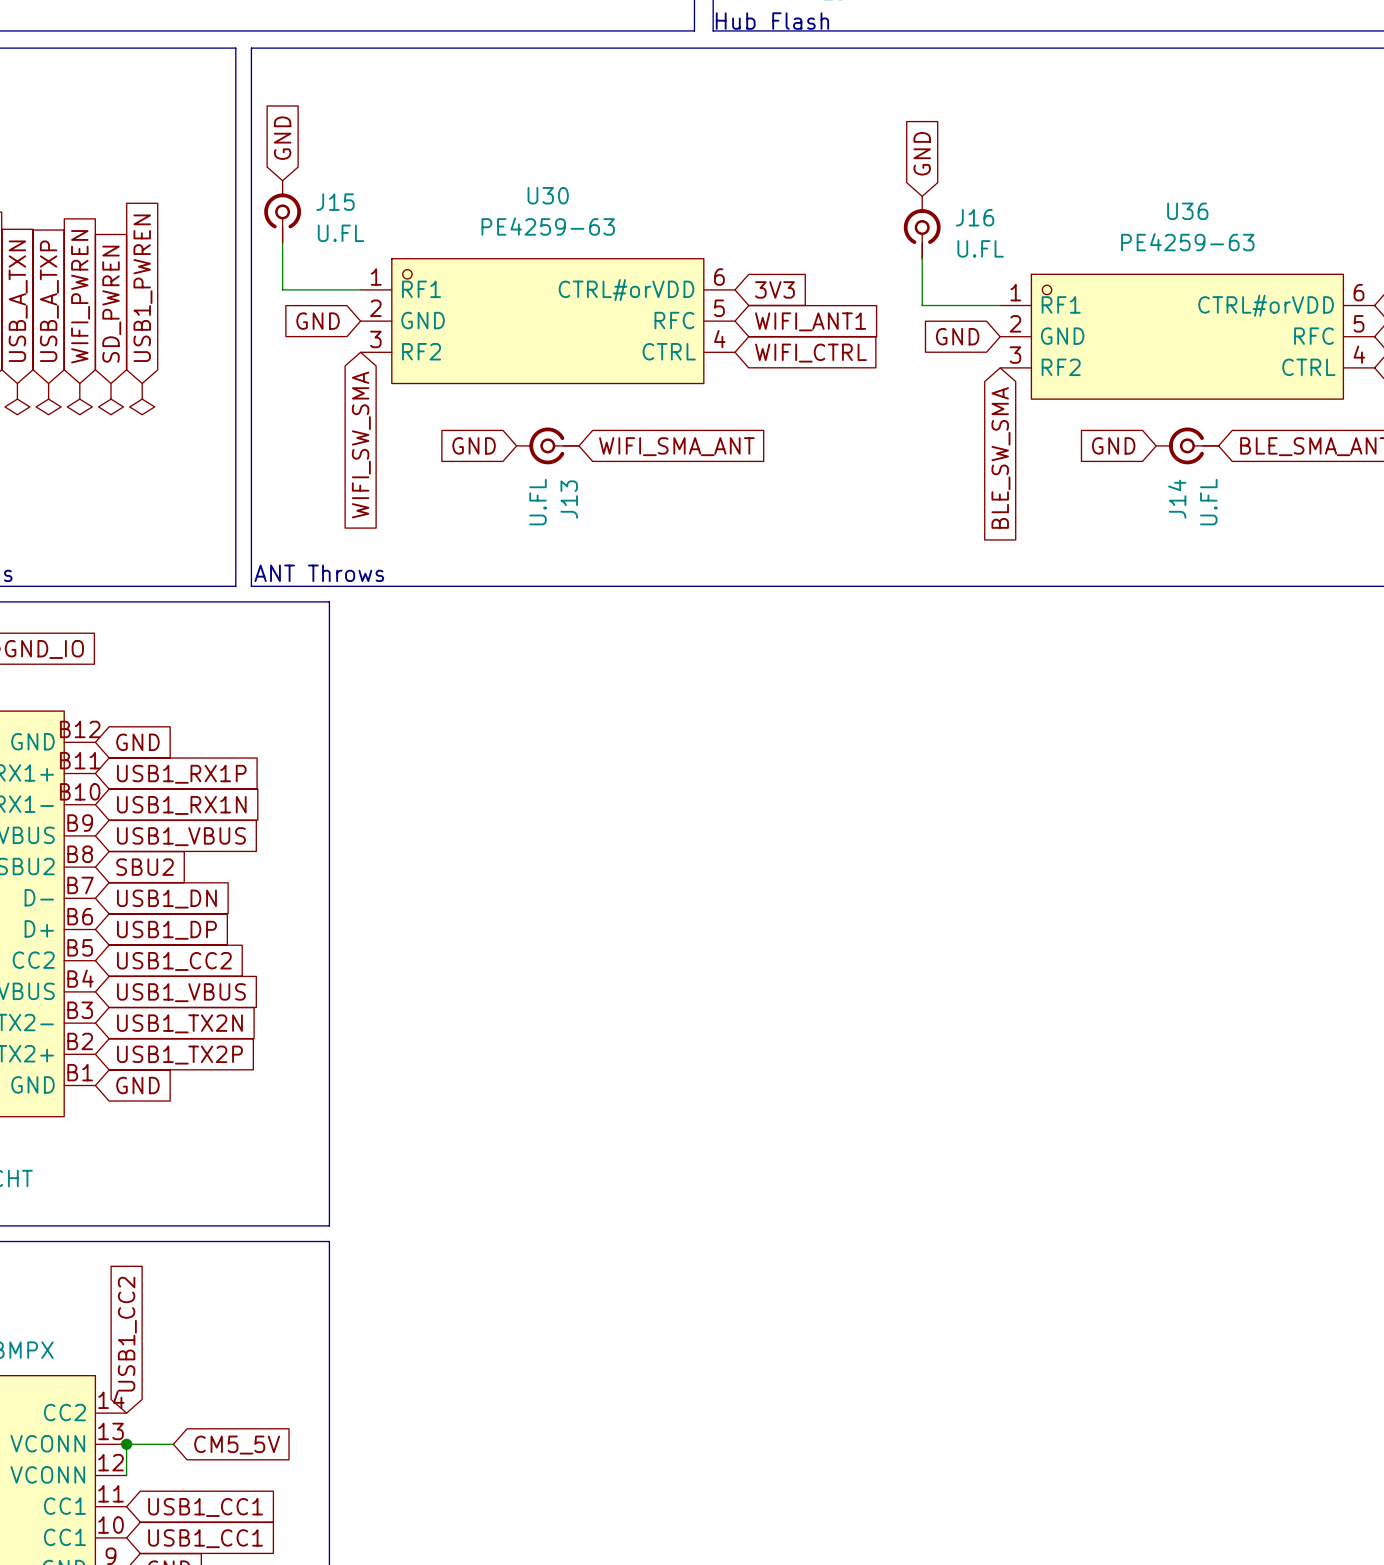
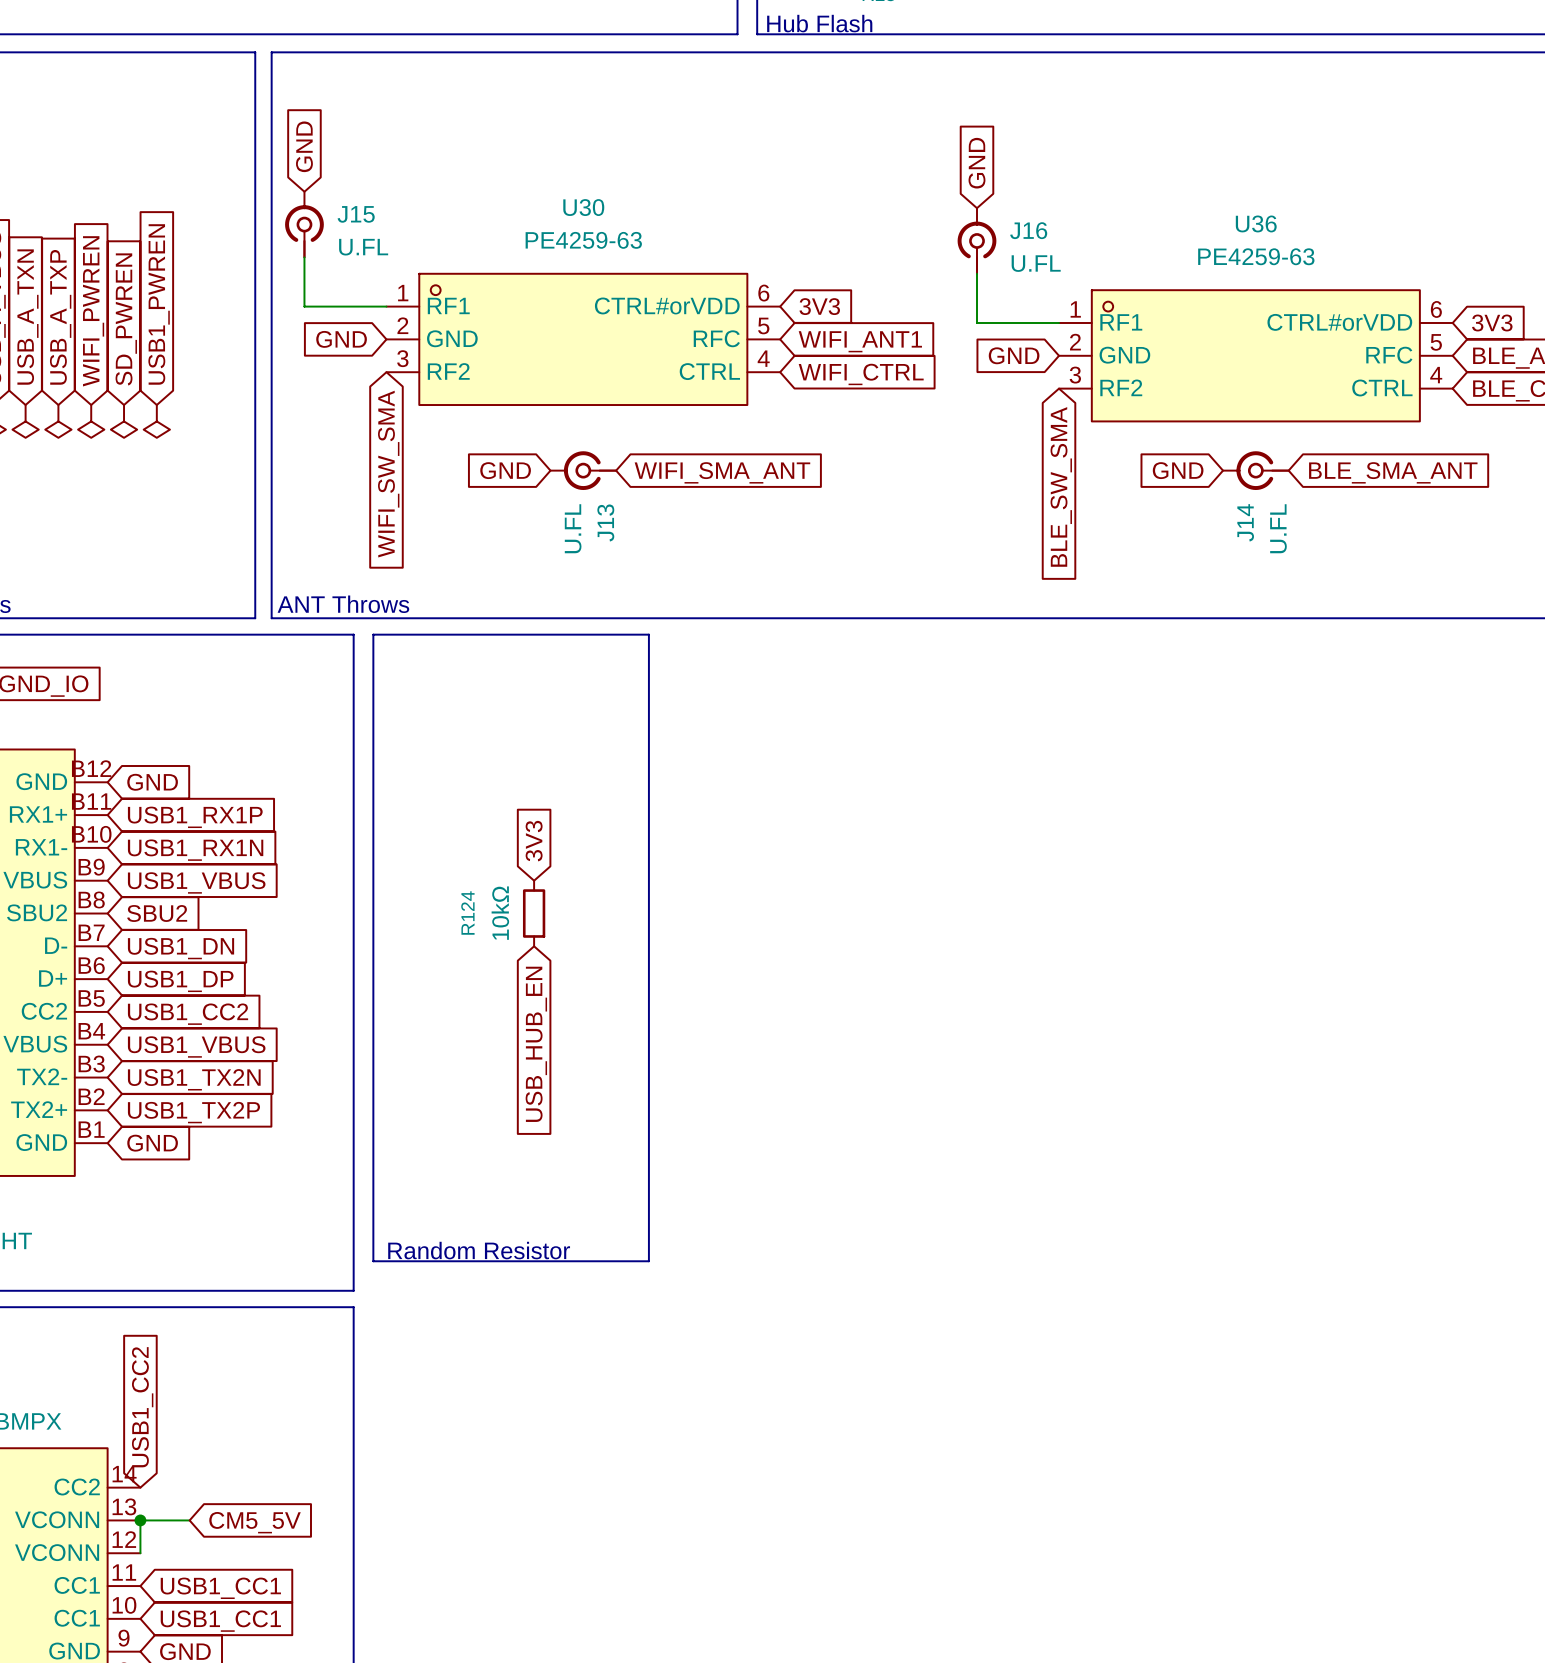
line: none -> (373, 634) (648, 634) (648, 1261) (373, 1261) (373, 634)
global label: none -> 3V3 (534, 841)
R124: none -> 10kΩ (534, 913)
global label: none -> USB_HUB_EN (536, 1044)
text: none -> Random Resistor (479, 1250)

